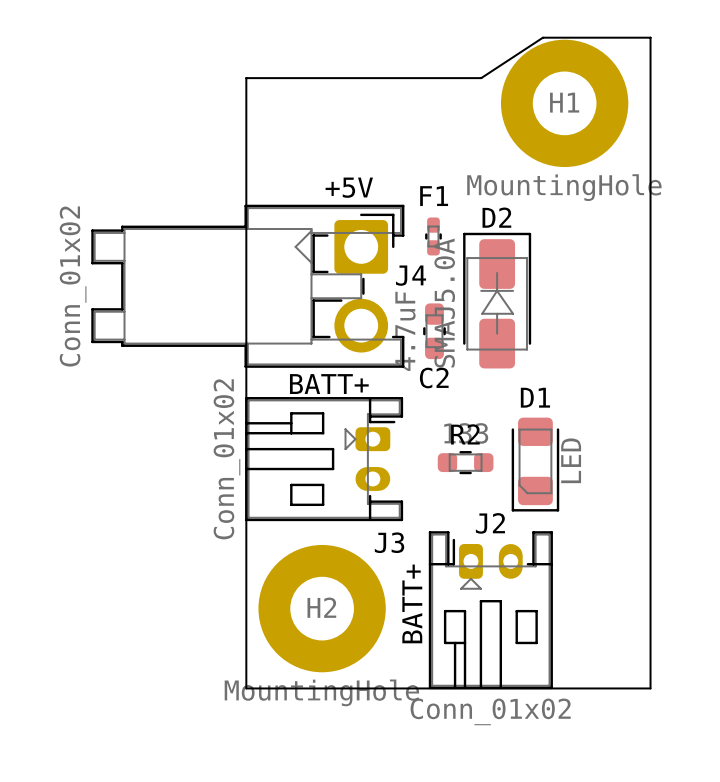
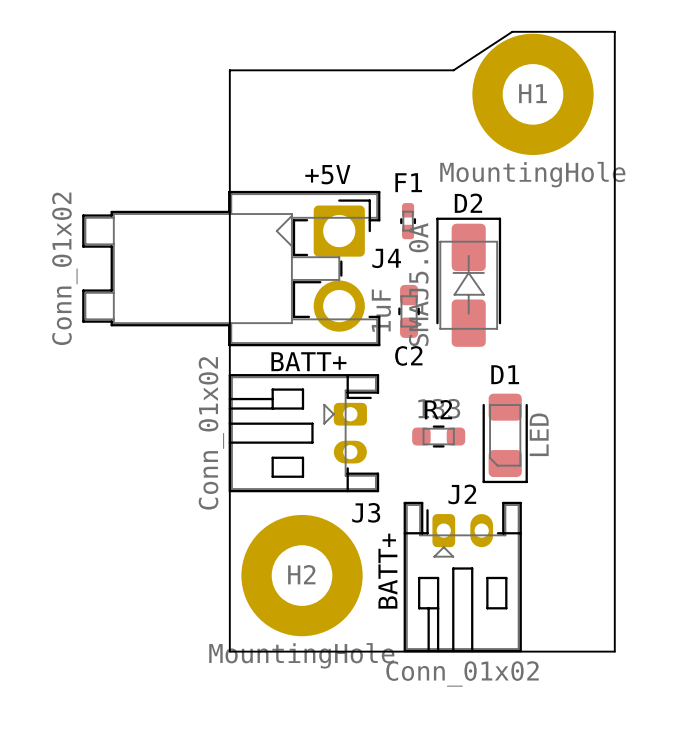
C2 value: 4.7uF (405, 331) -> 1uF (381, 310)

